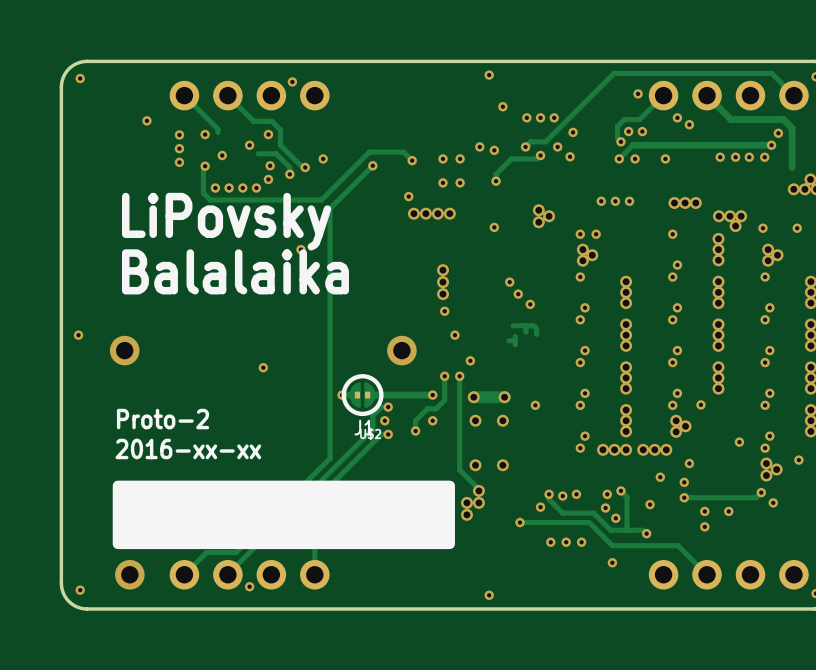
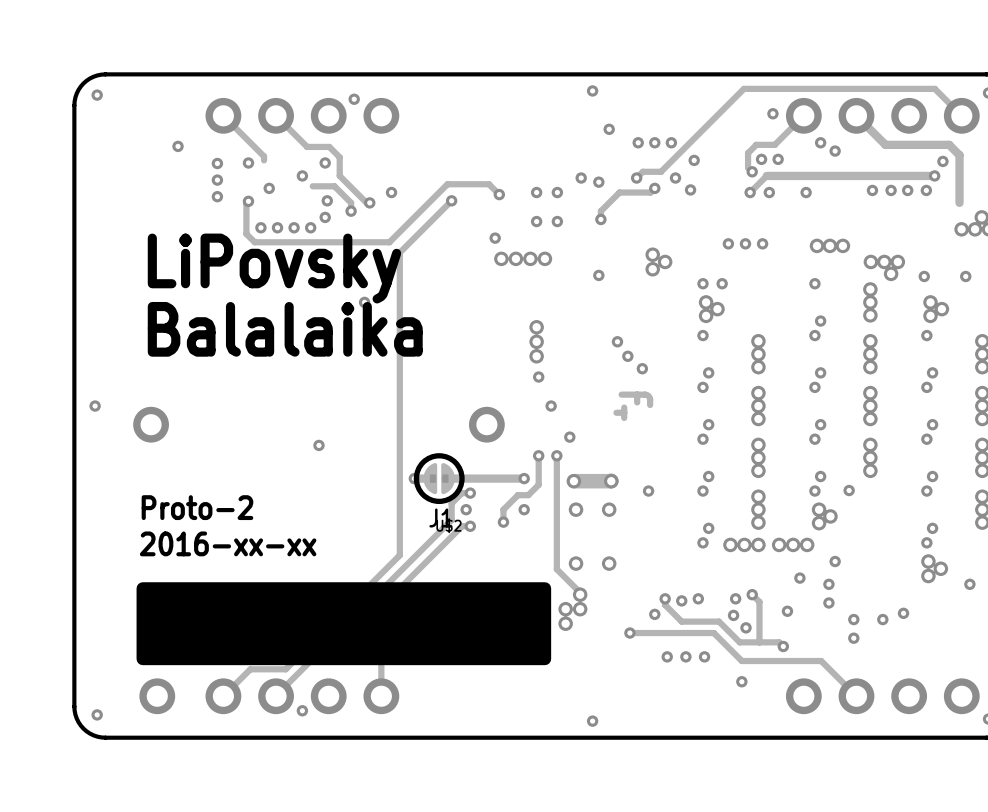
via: (739, 442) -> none
via: (798, 460) -> none
via: none -> (969, 584)
track: (761, 492) (756, 497) (684, 497) -> none
via: (761, 492) -> none
via: (773, 502) -> none
via: none -> (903, 613)

